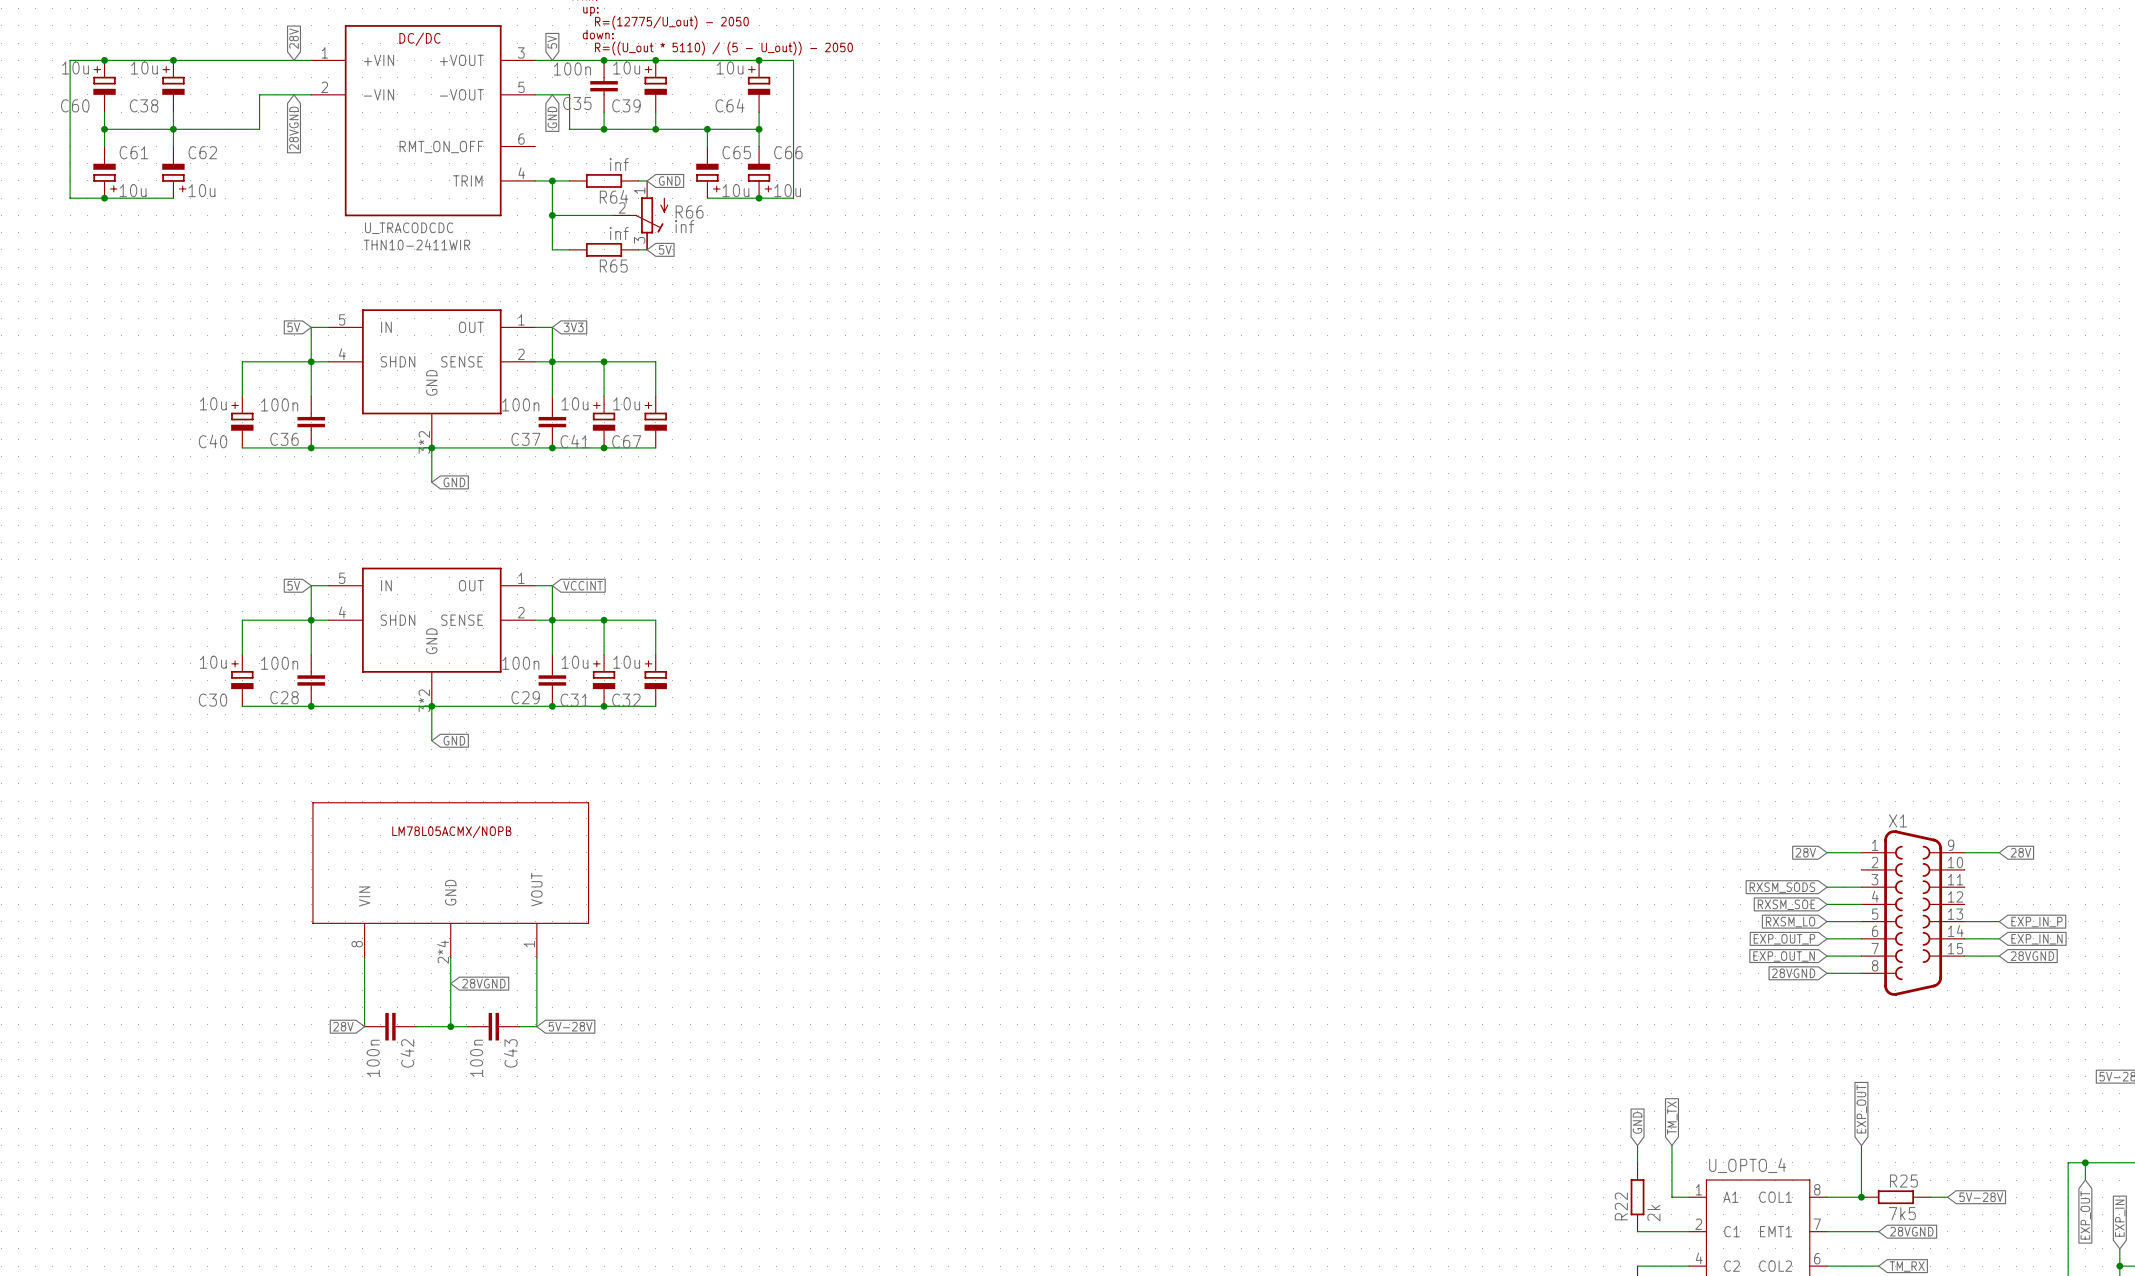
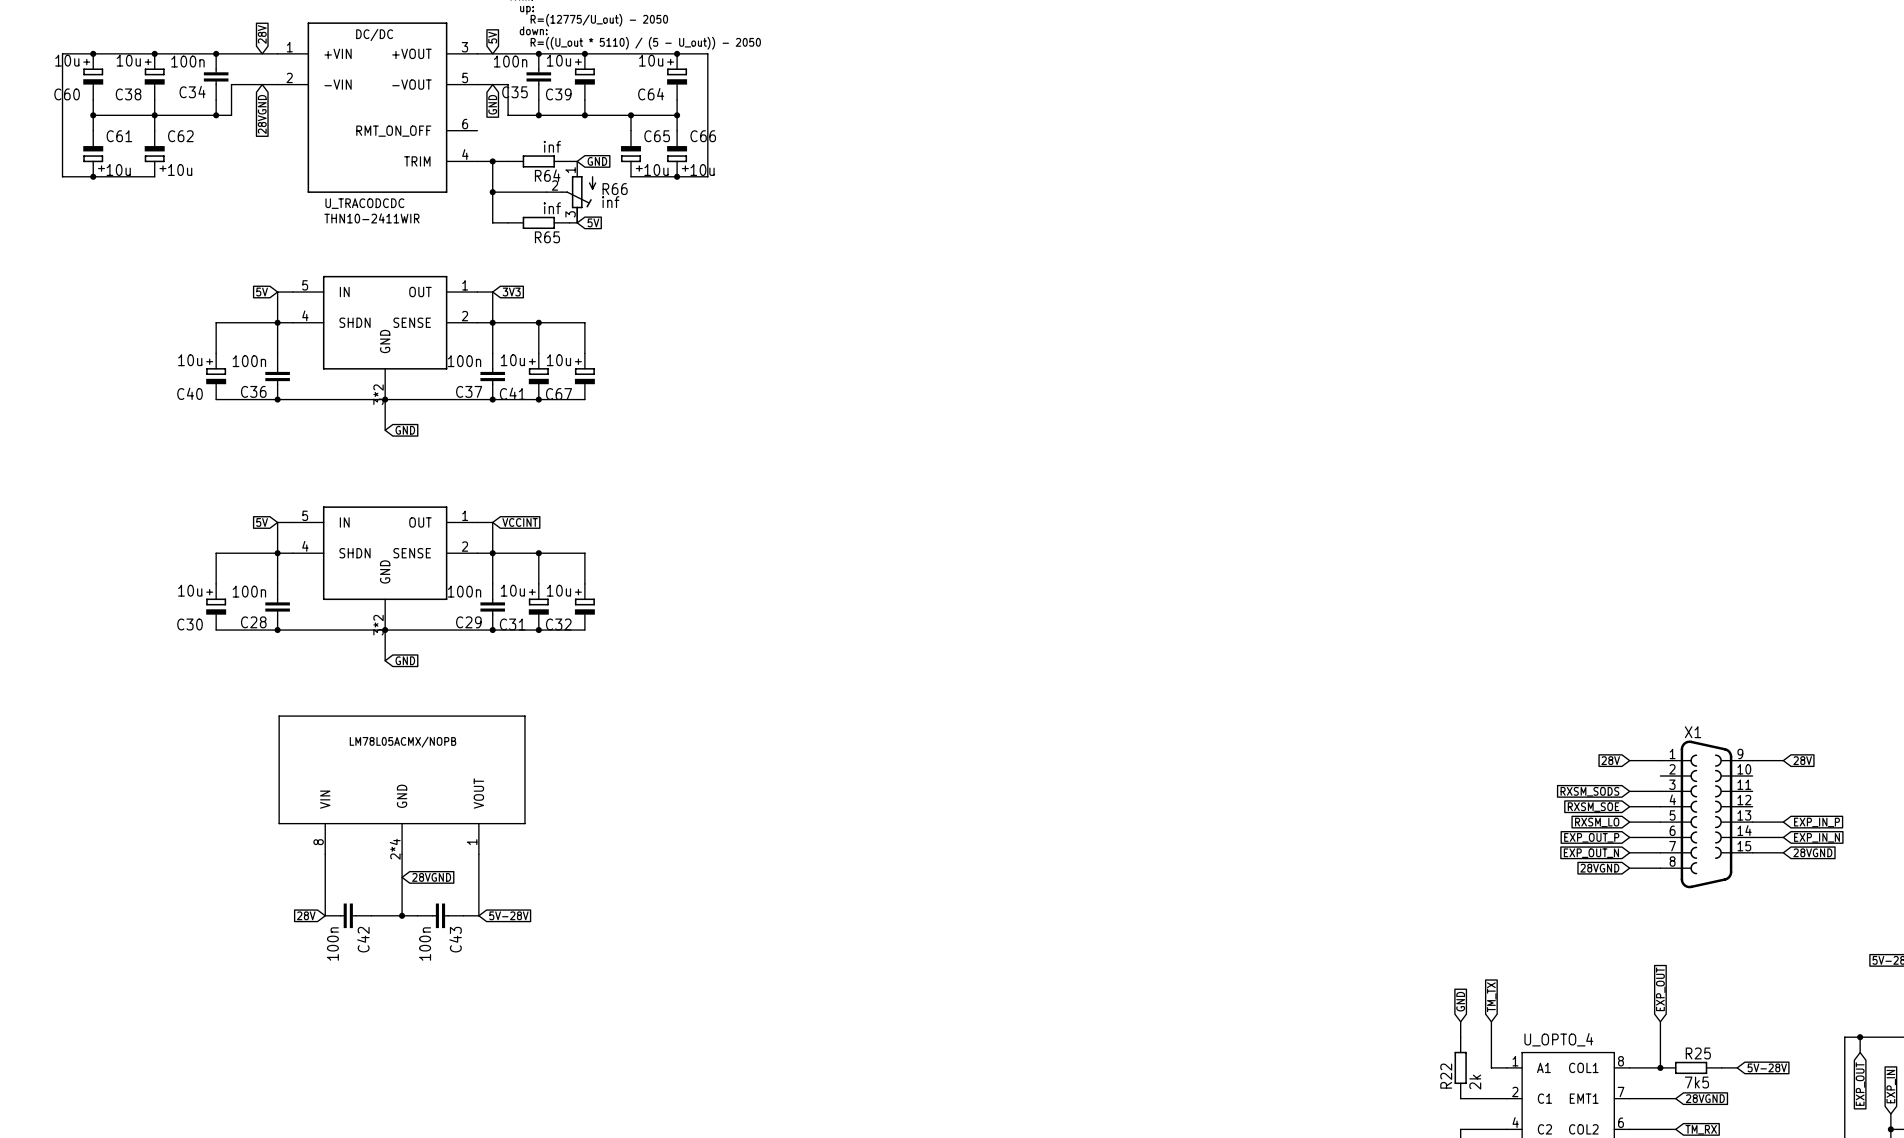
junction: none -> (216, 53)
C34: none -> 100n (216, 76)
wire: none -> (216, 99) (216, 115)
junction: none -> (216, 115)

